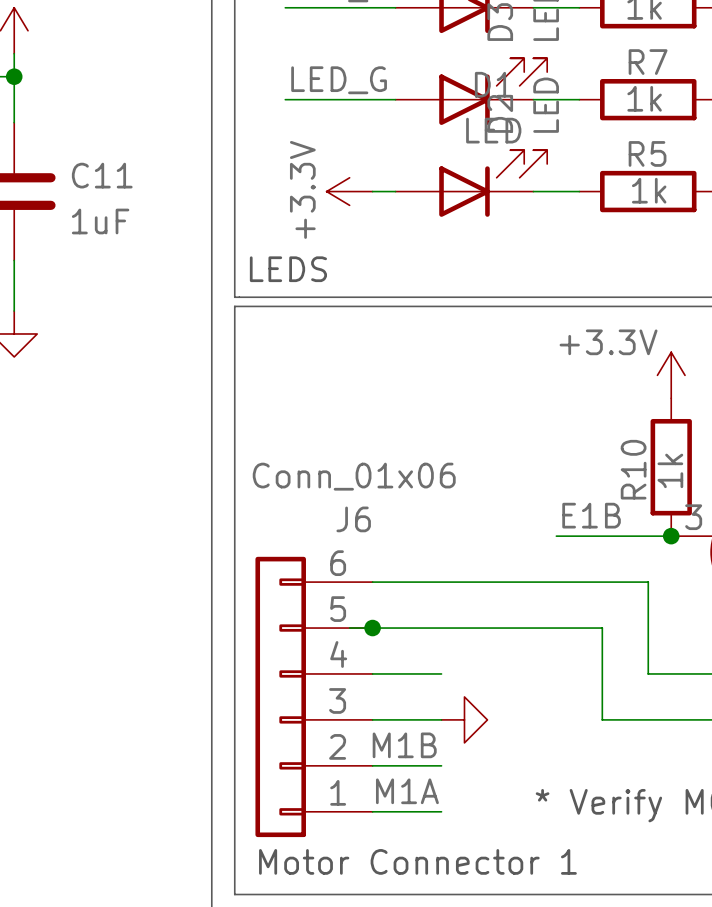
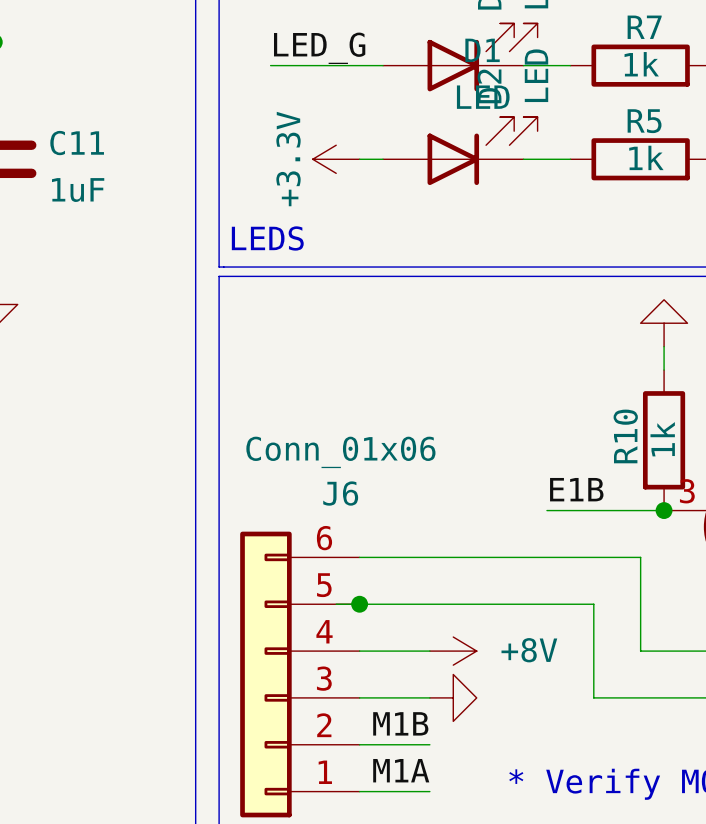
power symbol: none -> (664, 323)
power symbol: +3.3V (671, 375) -> none
power symbol: none -> +8V (453, 651)

